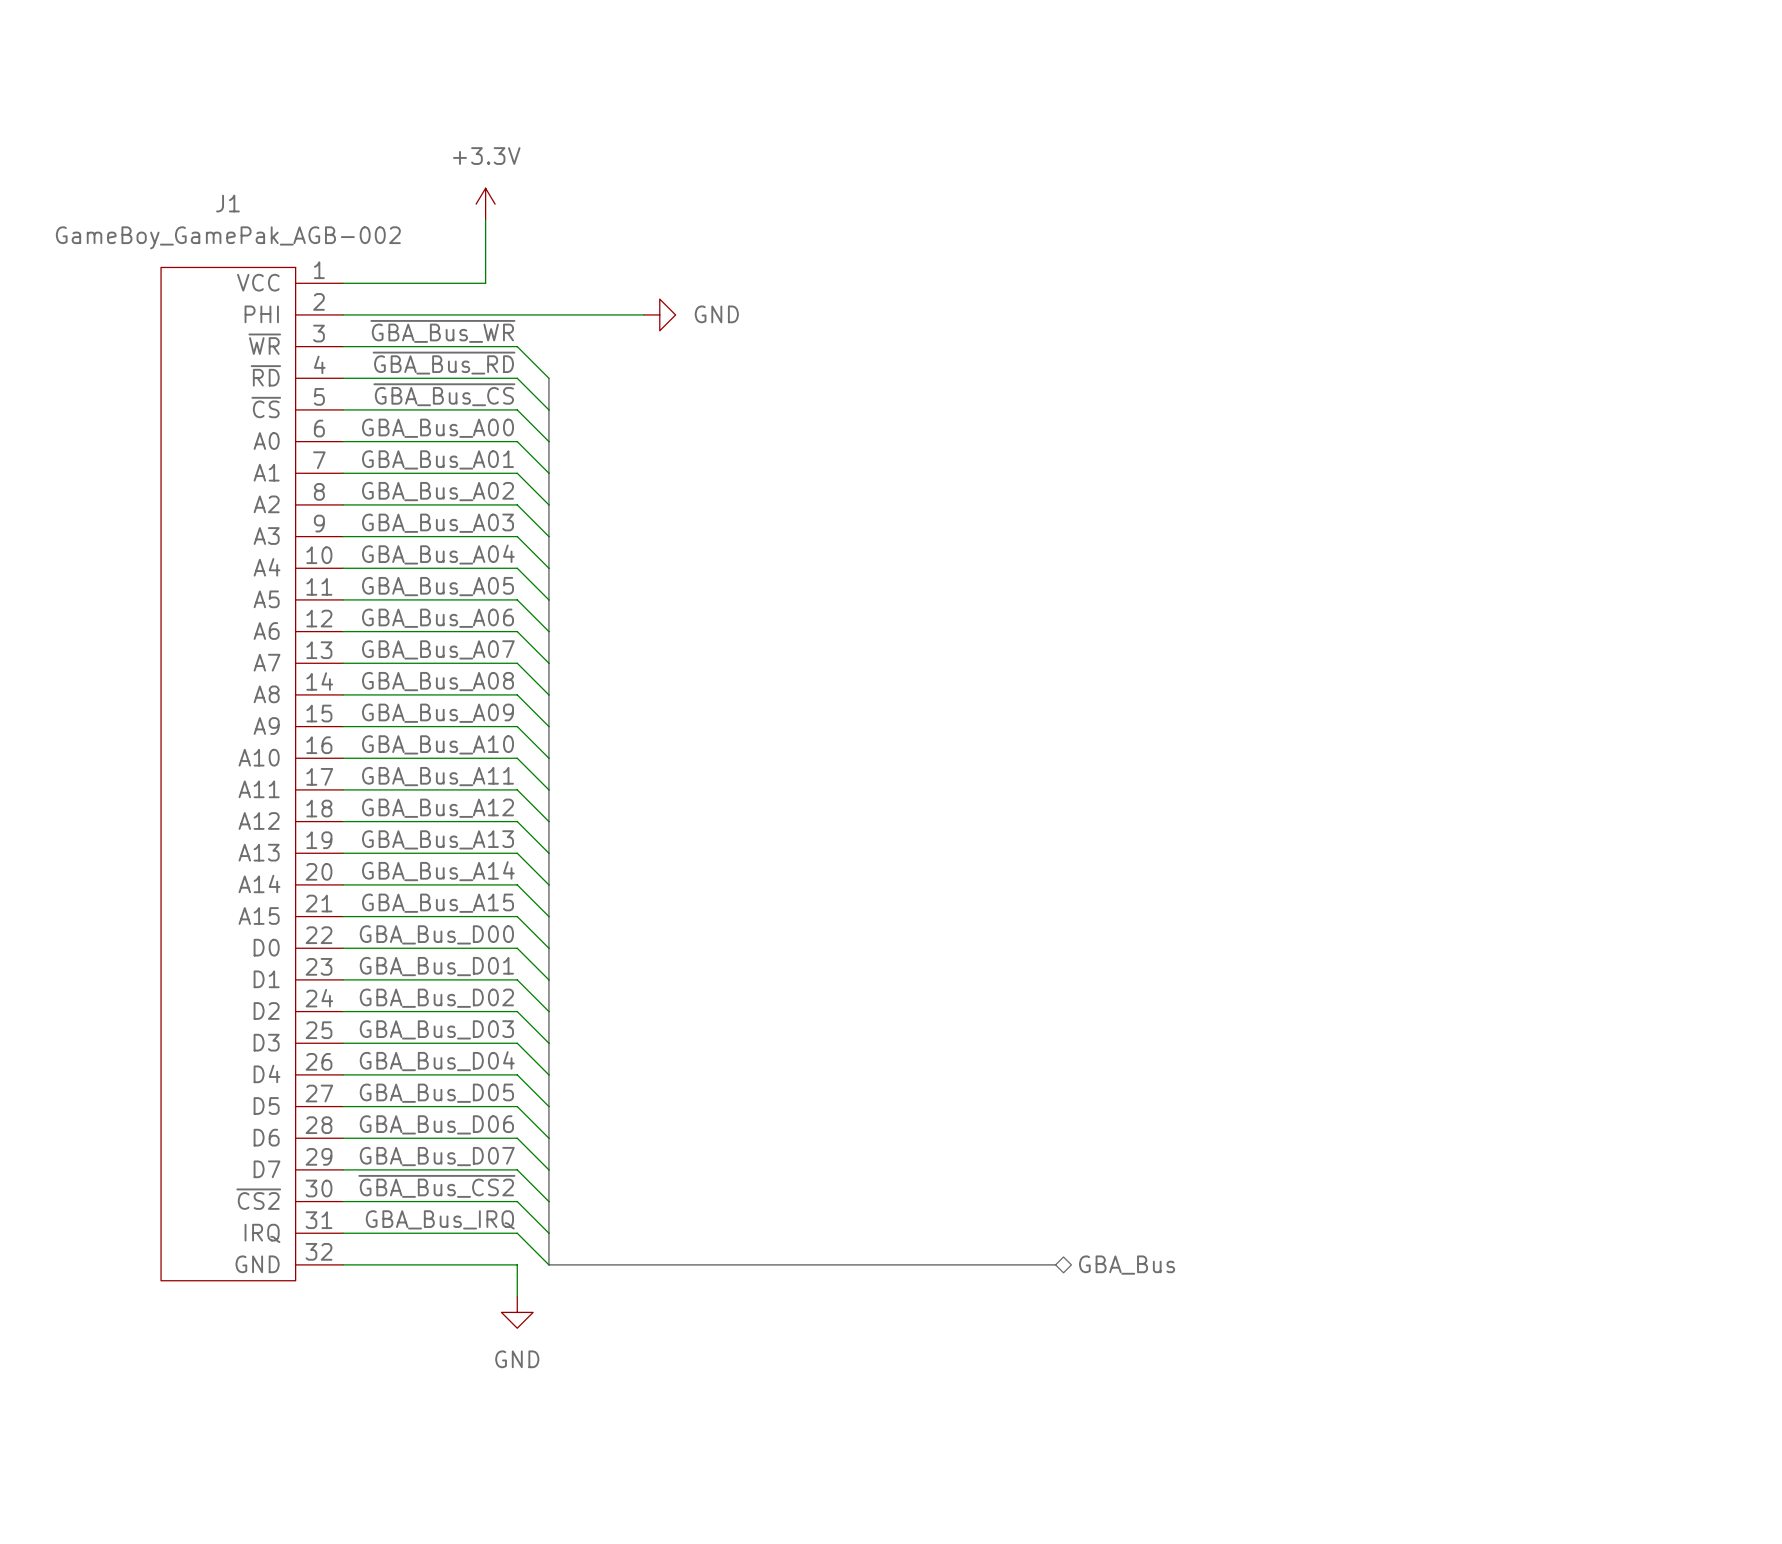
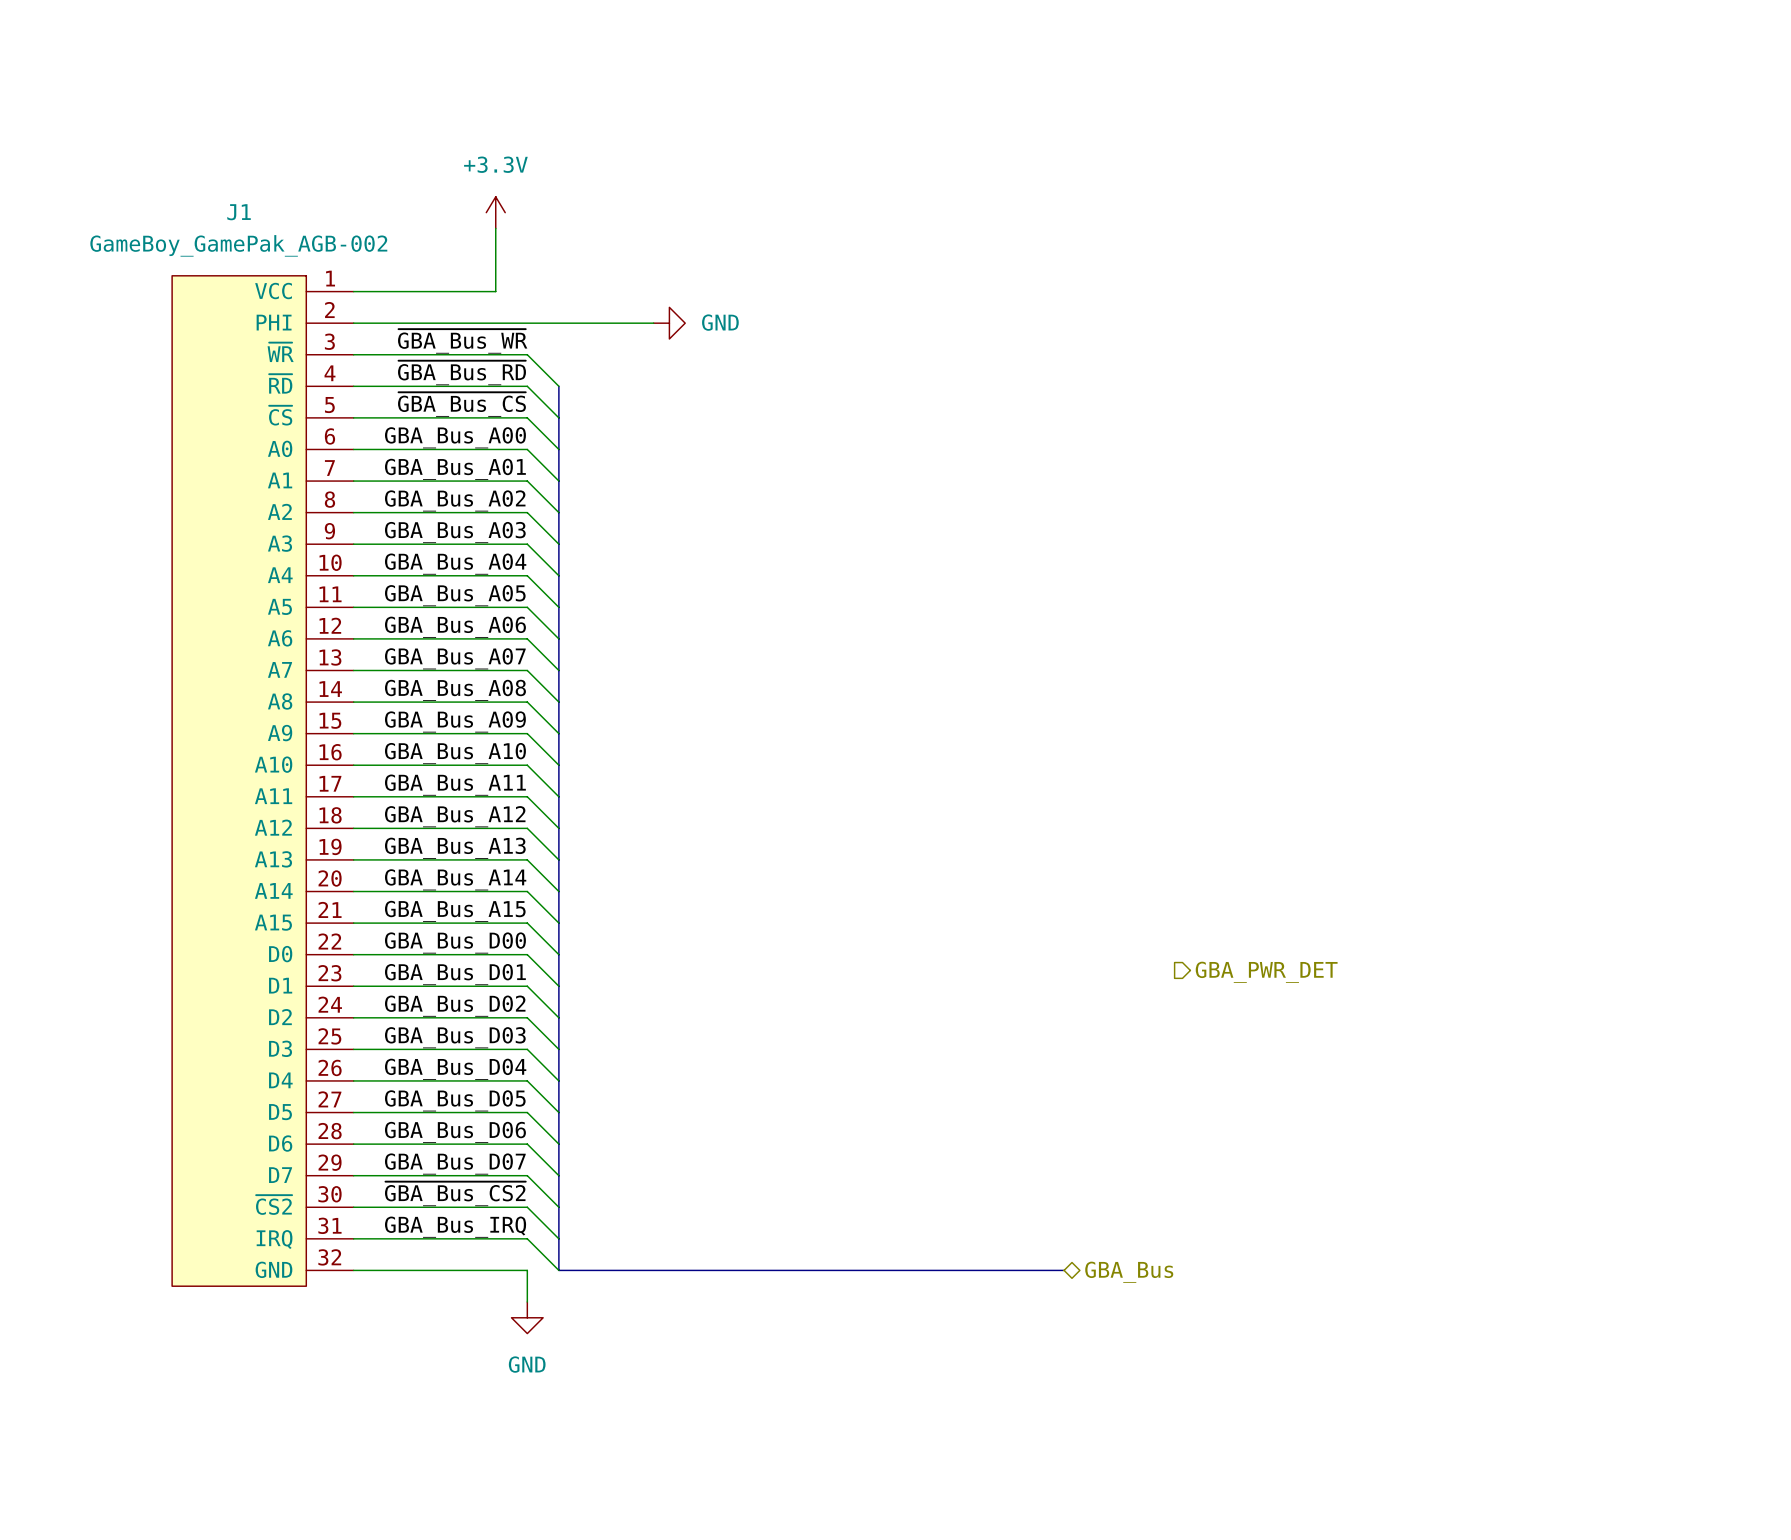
hierarchical label: none -> GBA_PWR_DET (1266, 972)

